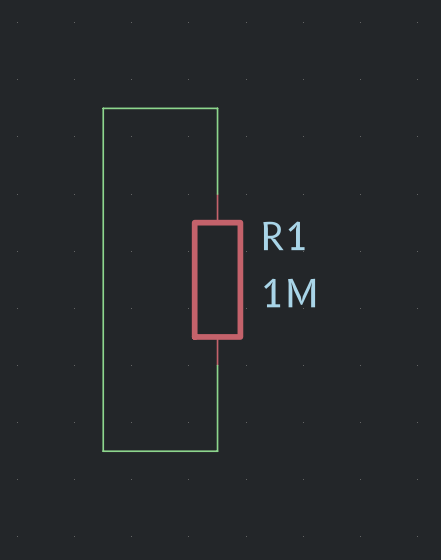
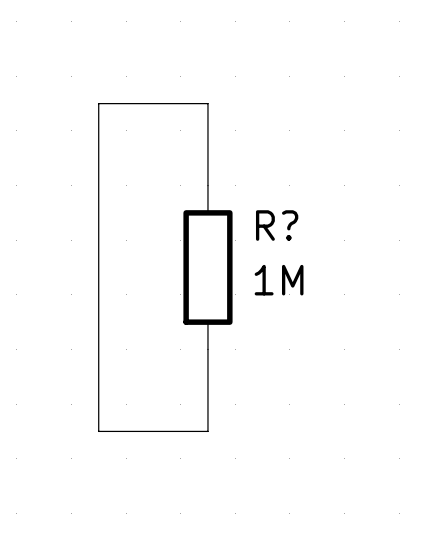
R1 name: R1 (283, 235) -> R? (277, 225)

